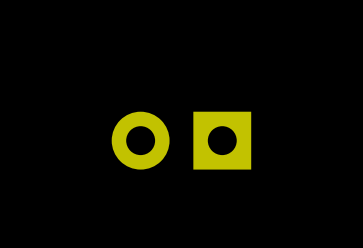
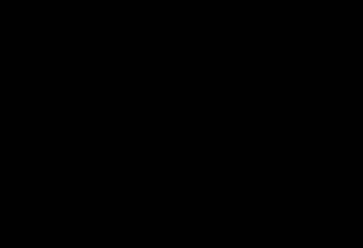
part: (181, 140) -> none

